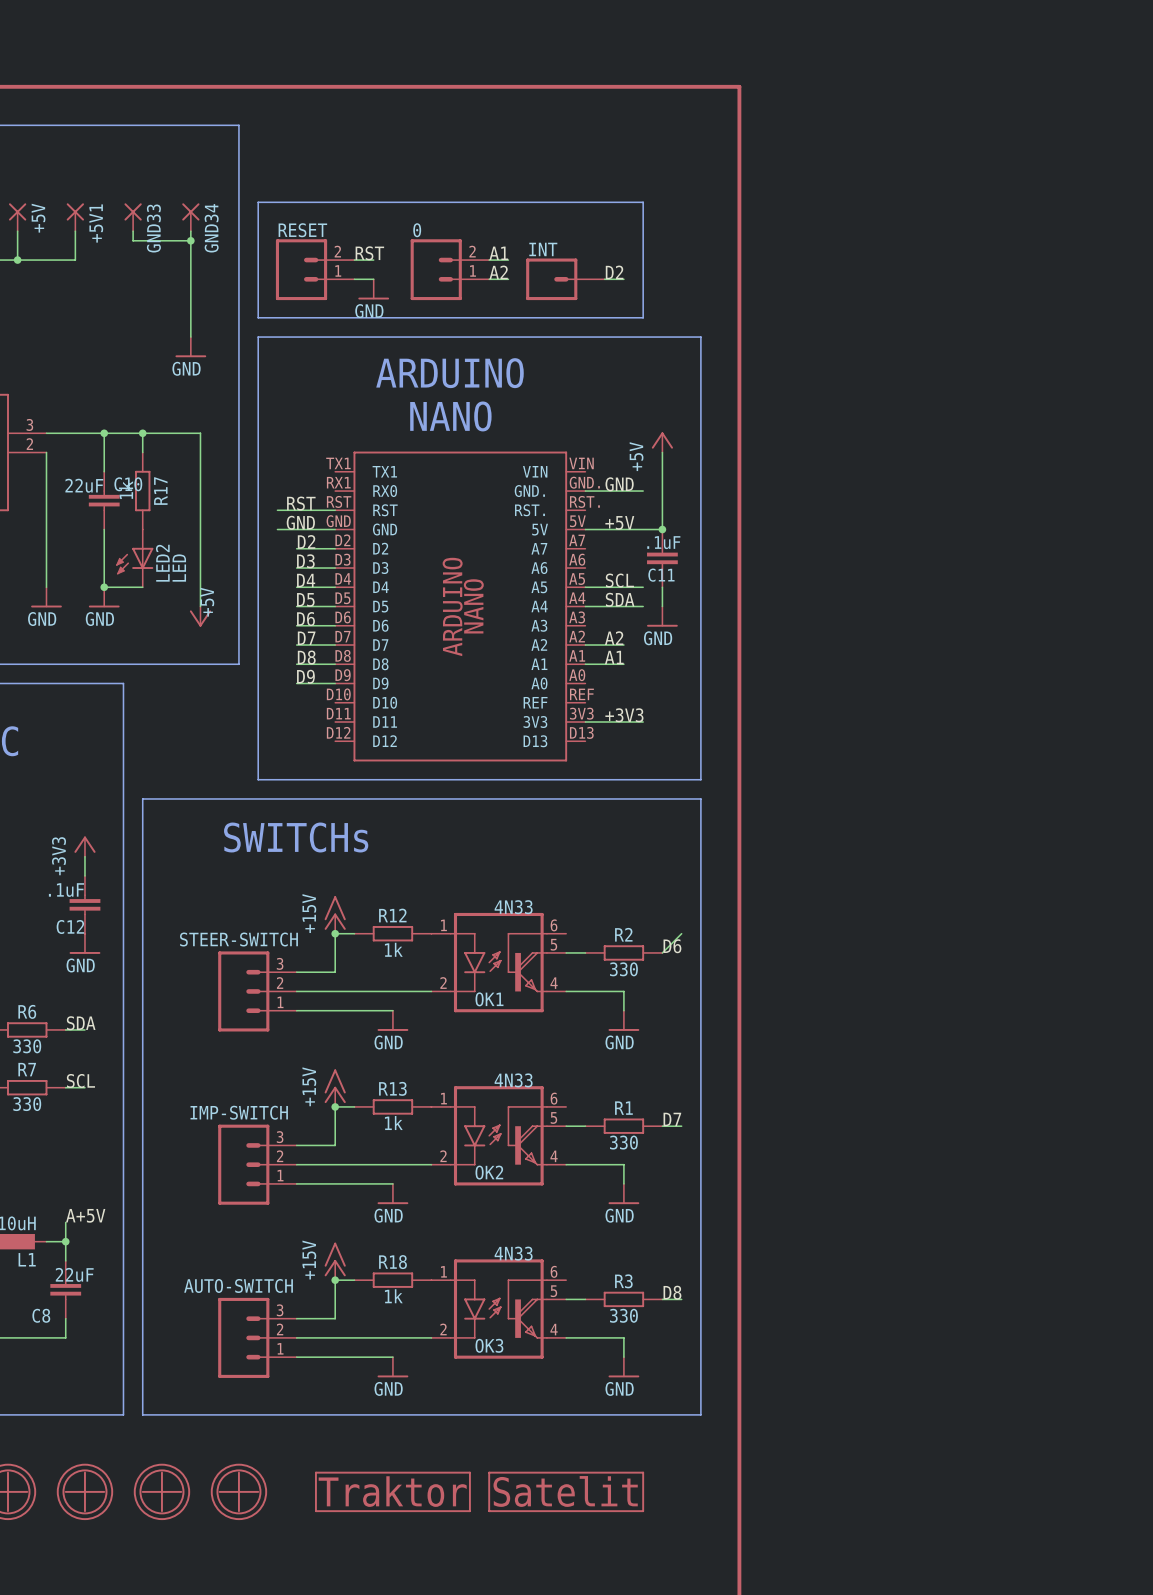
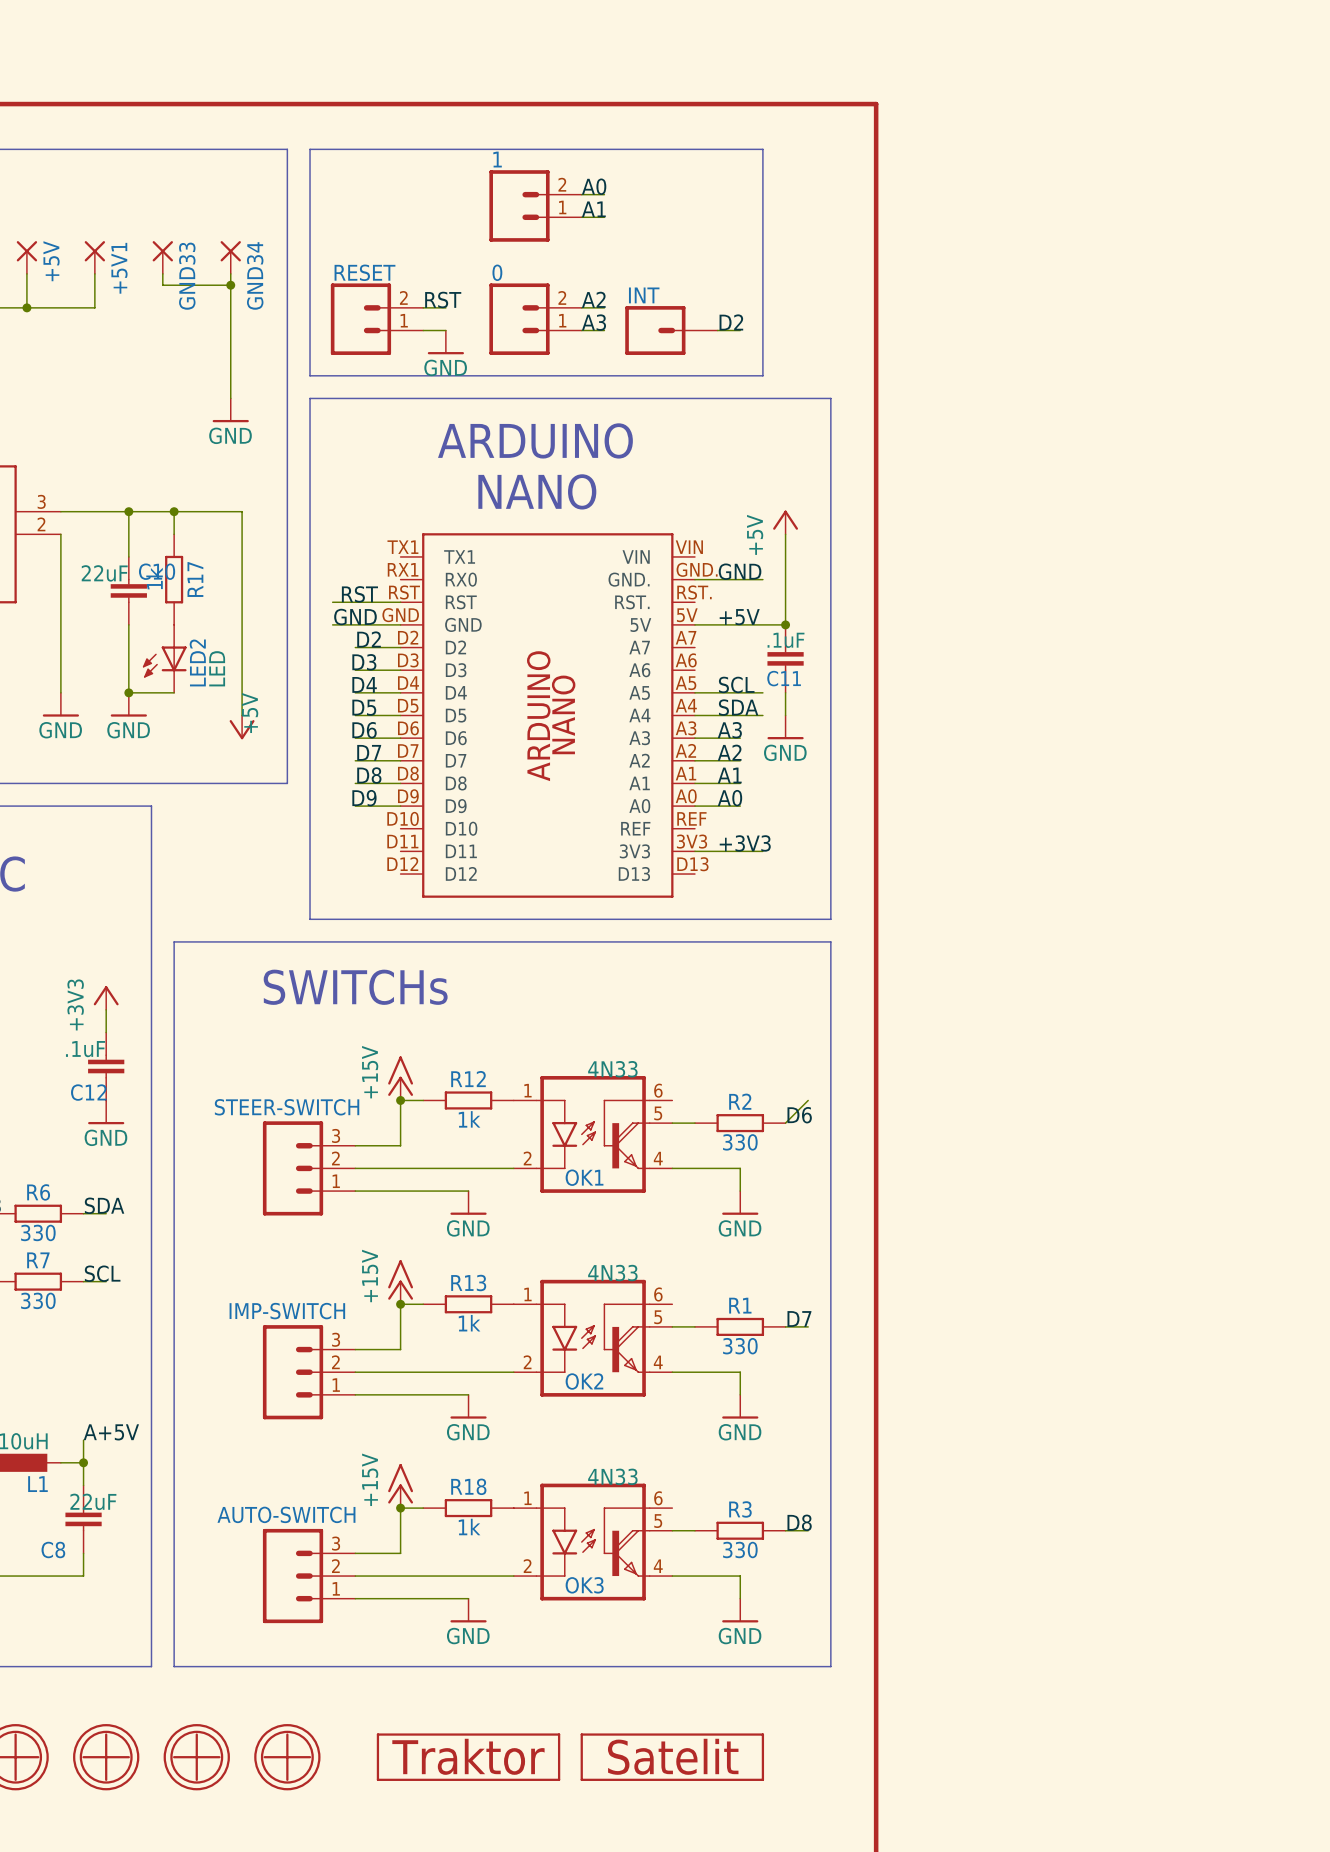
label: none -> A0 (594, 186)
wire: none -> (581, 194) (604, 194)
1: none -> (535, 205)
label: none -> A1 (593, 209)
wire: none -> (581, 217) (604, 217)
line: (258, 202) (643, 202) -> (310, 239) (310, 149) (762, 149) (762, 239)
label: A1 (498, 253) -> A2 (593, 299)
label: A2 (498, 272) -> A3 (593, 322)
label: none -> A3 (729, 730)
wire: none -> (694, 738) (740, 738)
label: none -> A0 (729, 798)
wire: none -> (694, 806) (740, 806)

